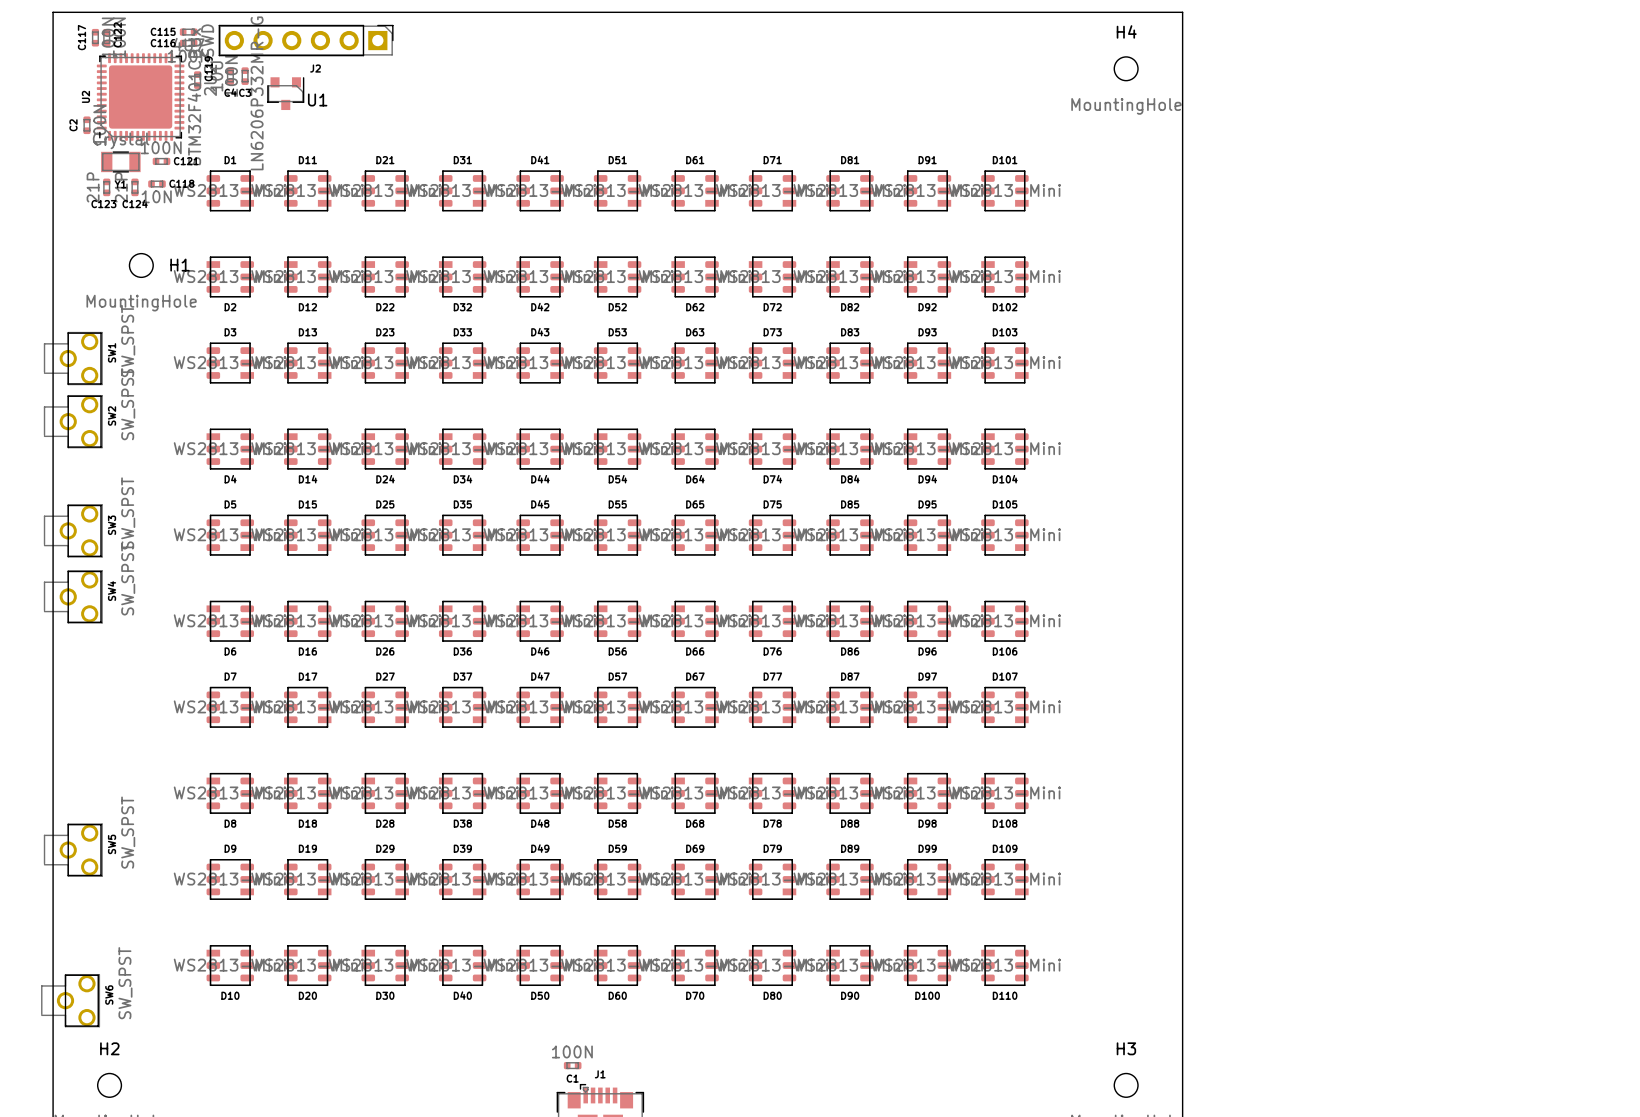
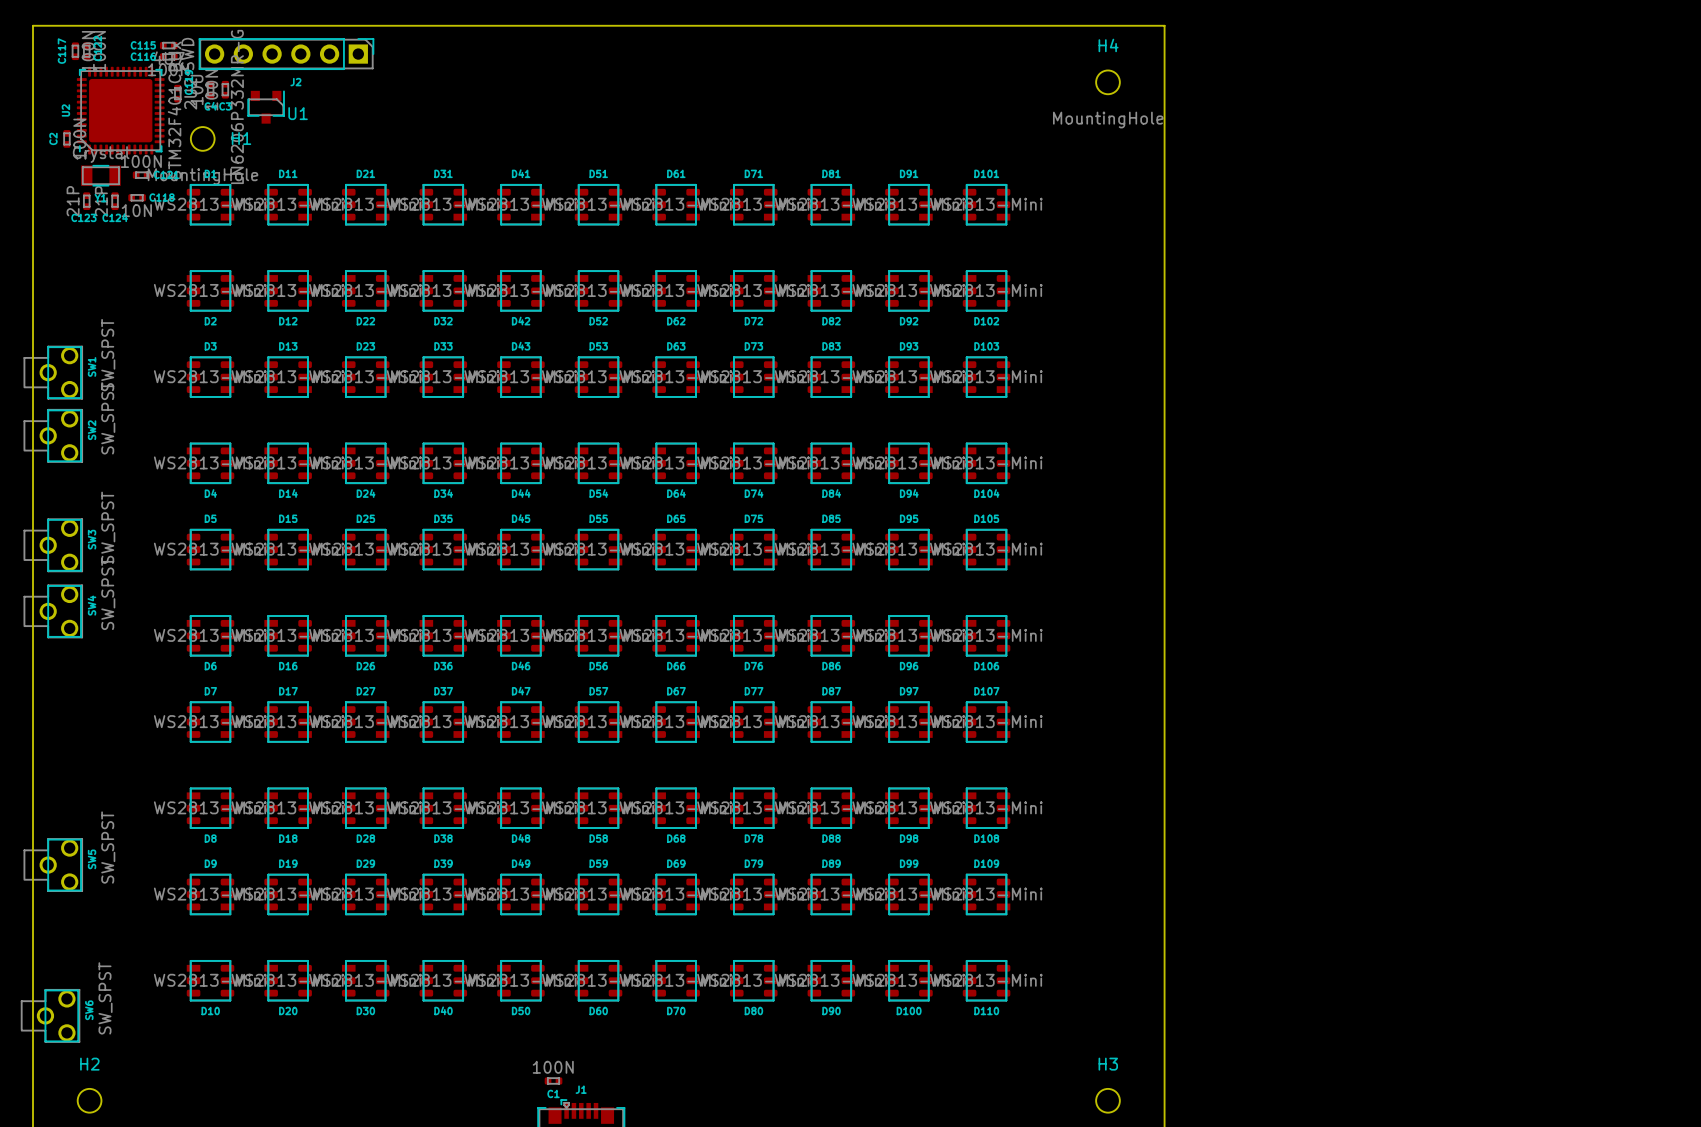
H1 position: (141, 265) -> (202, 138)

